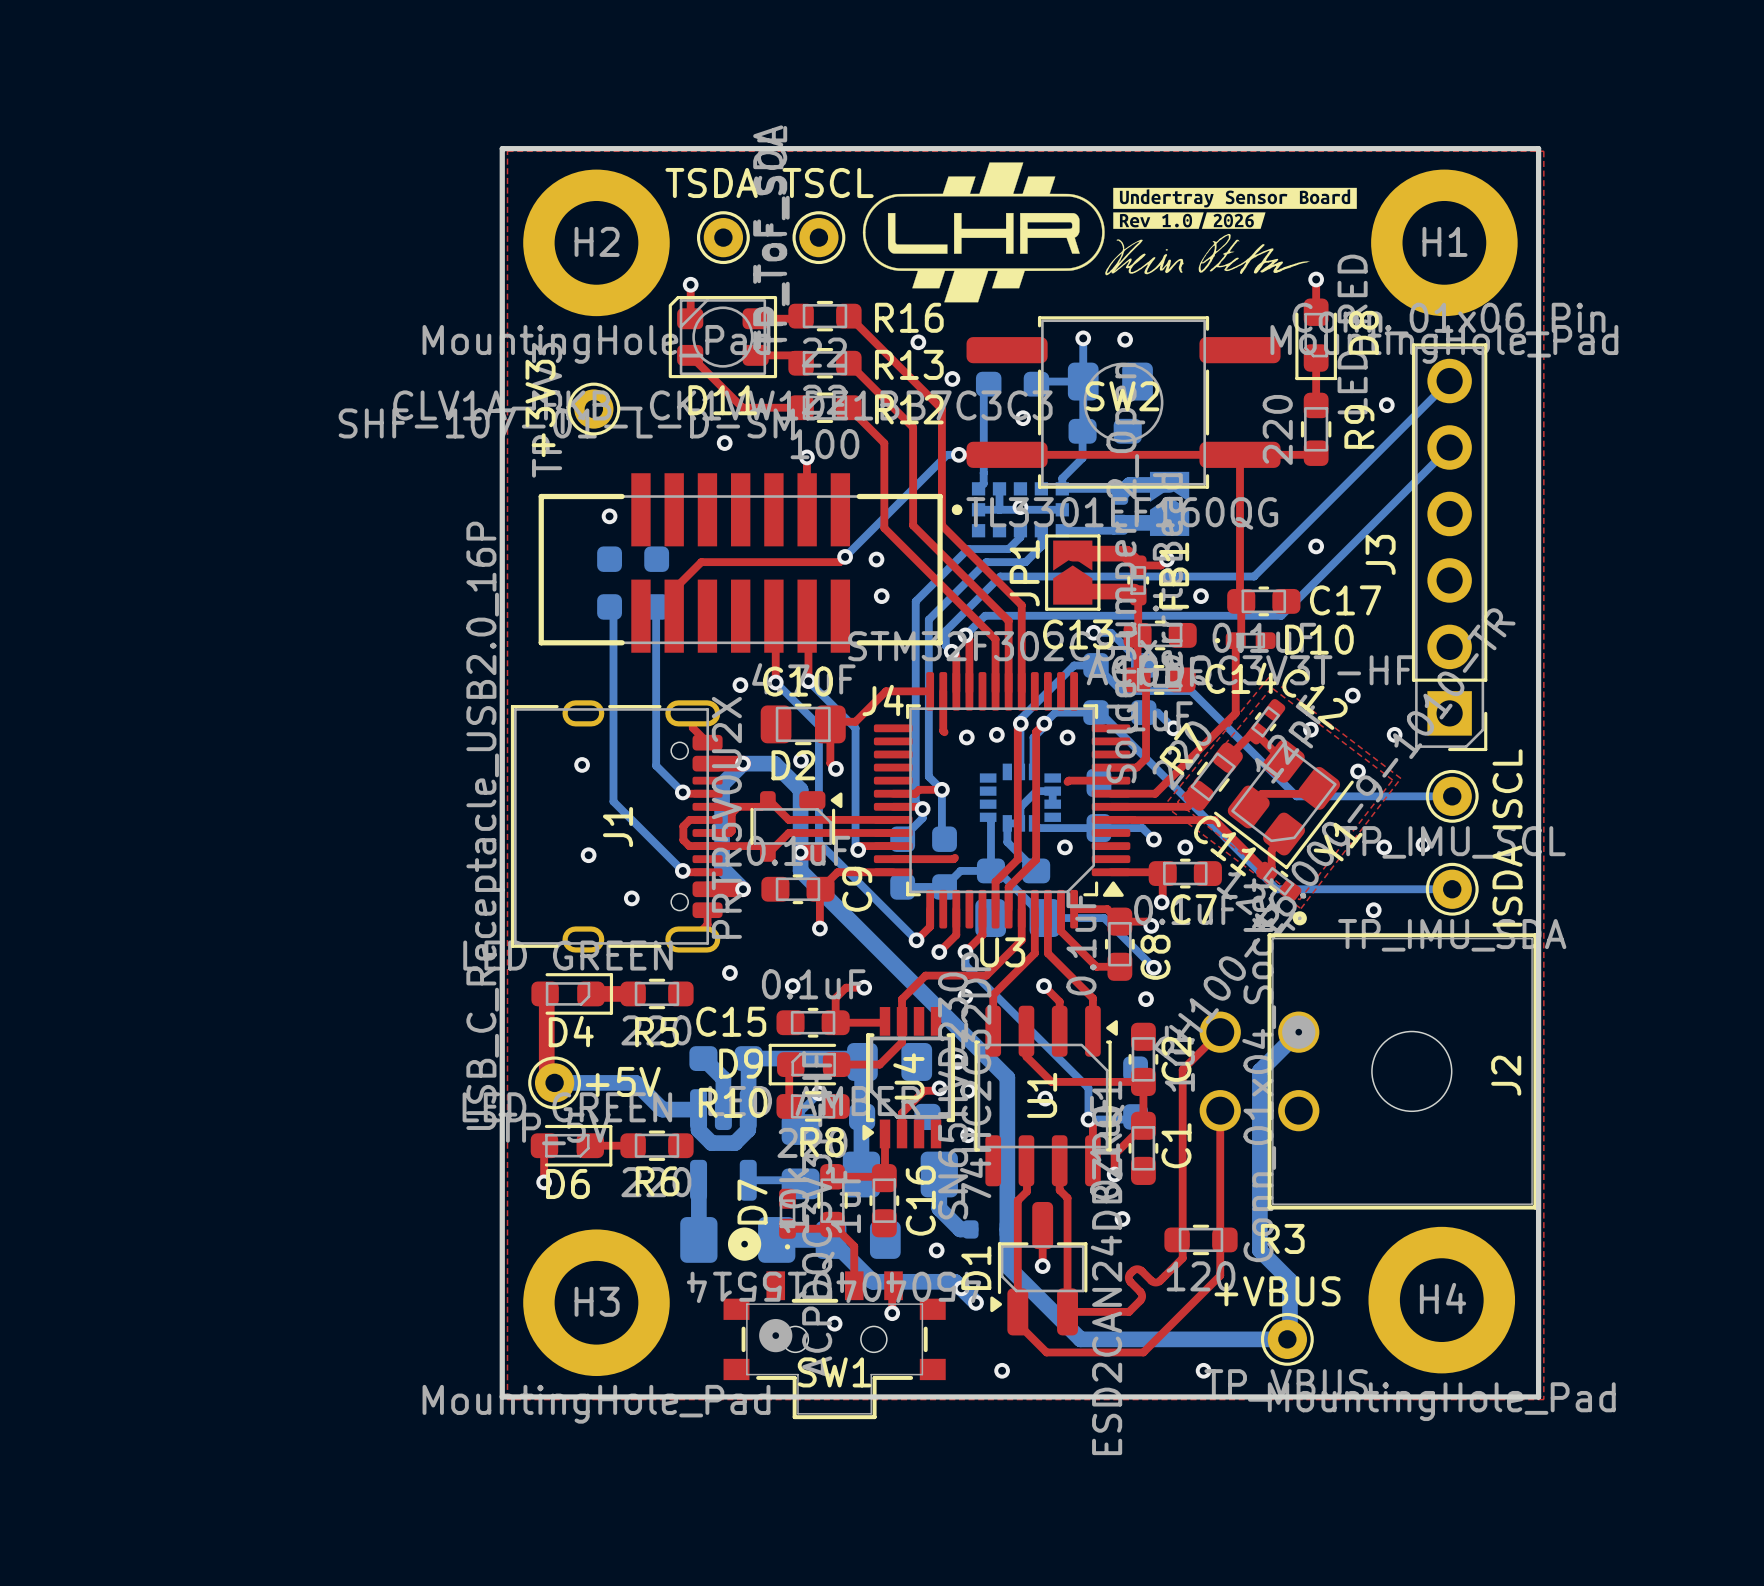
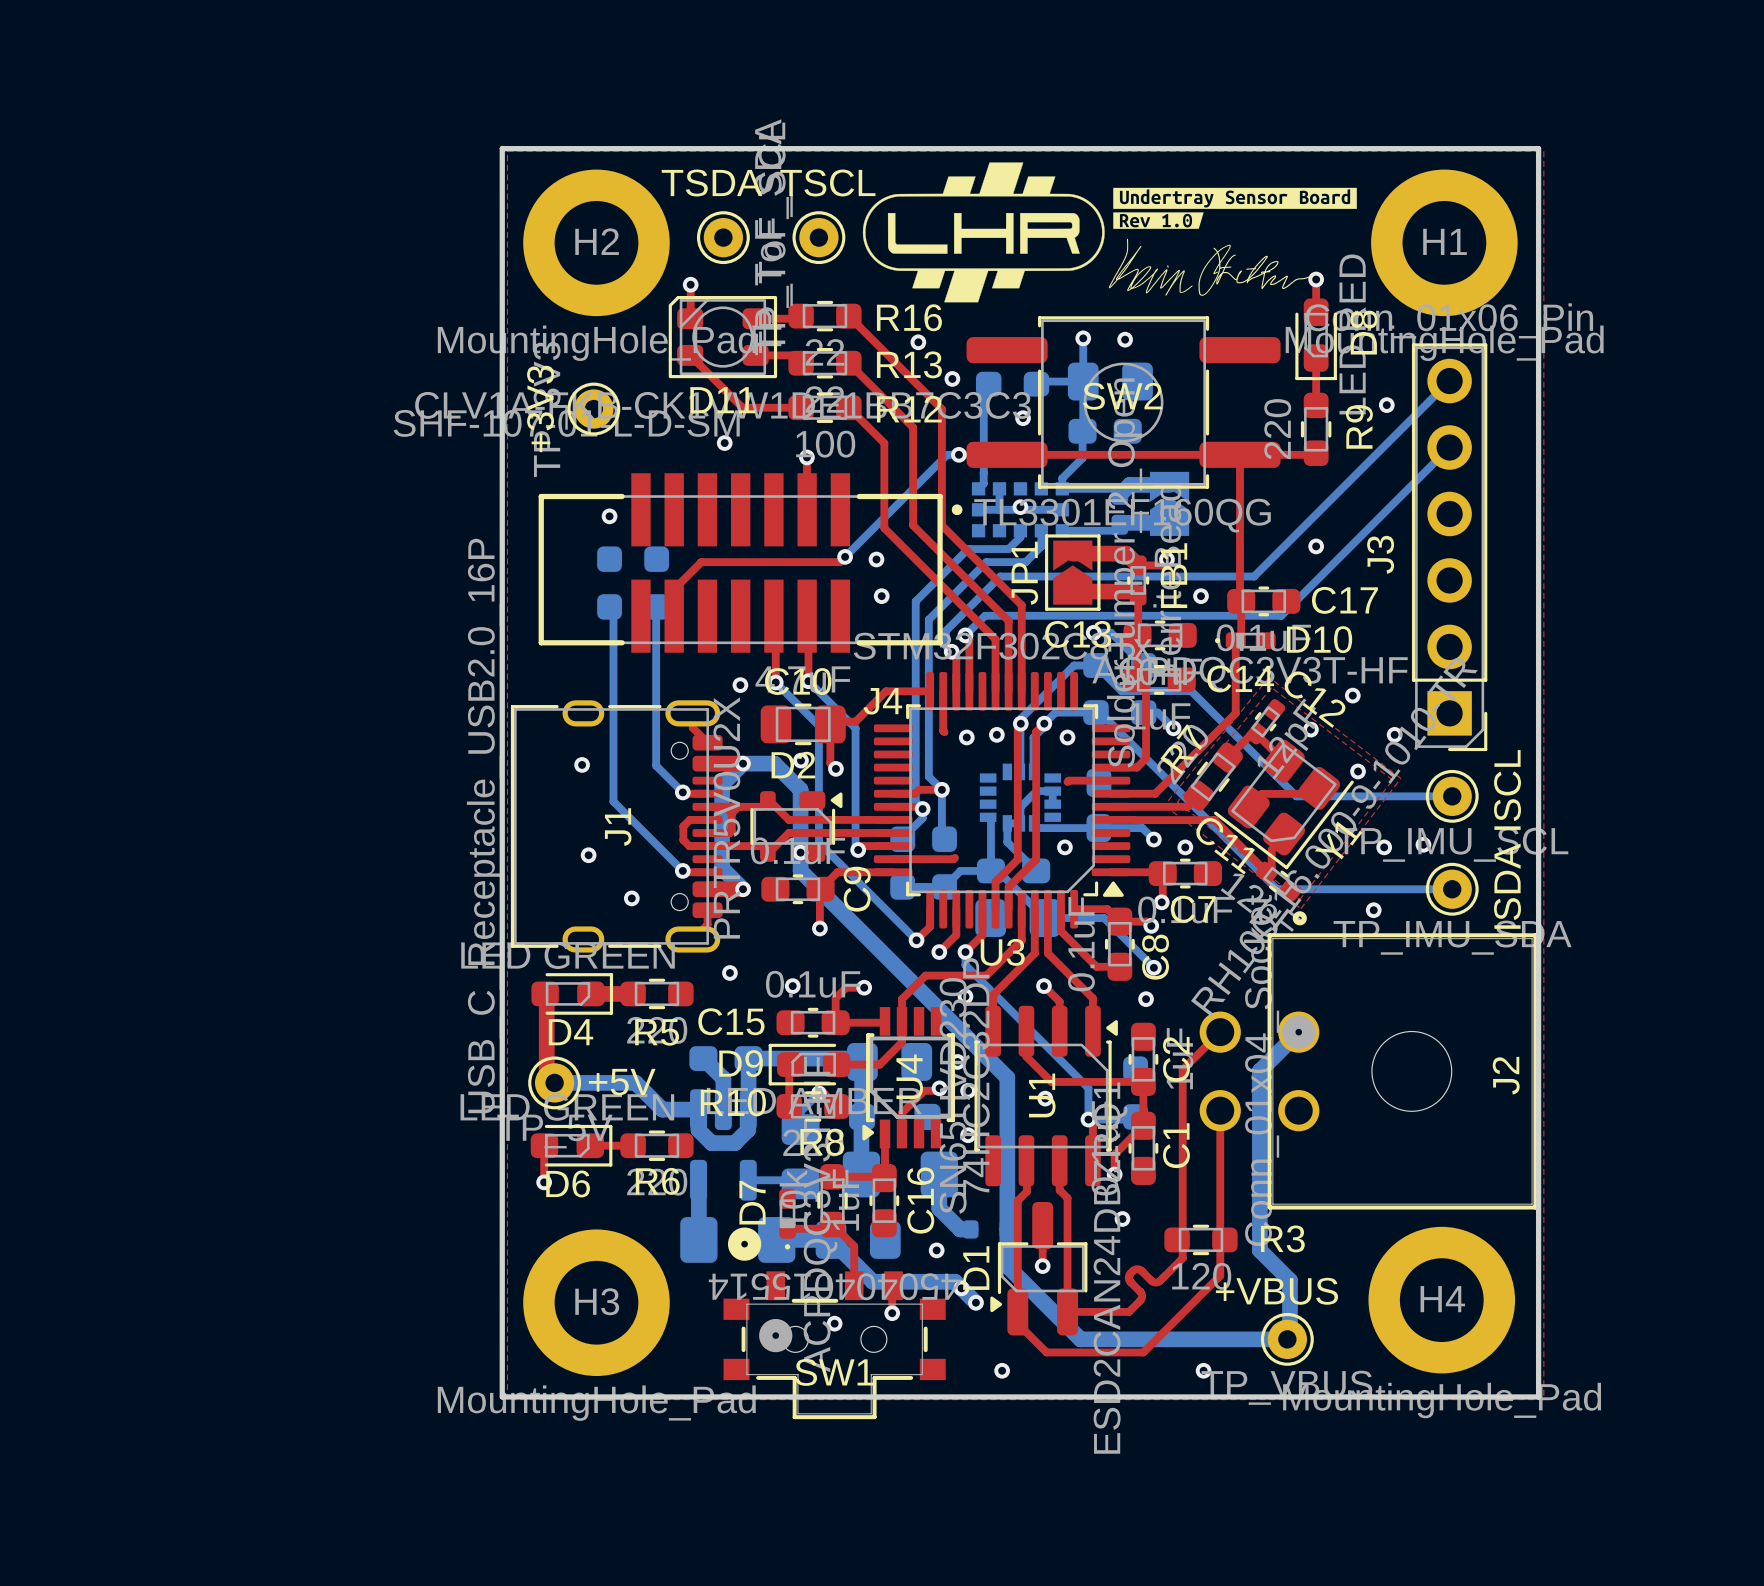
drawing: [1201, 212, 1266, 229] -> none
drawing shape: [1105, 233, 1310, 276] -> [1107, 238, 1319, 297]

